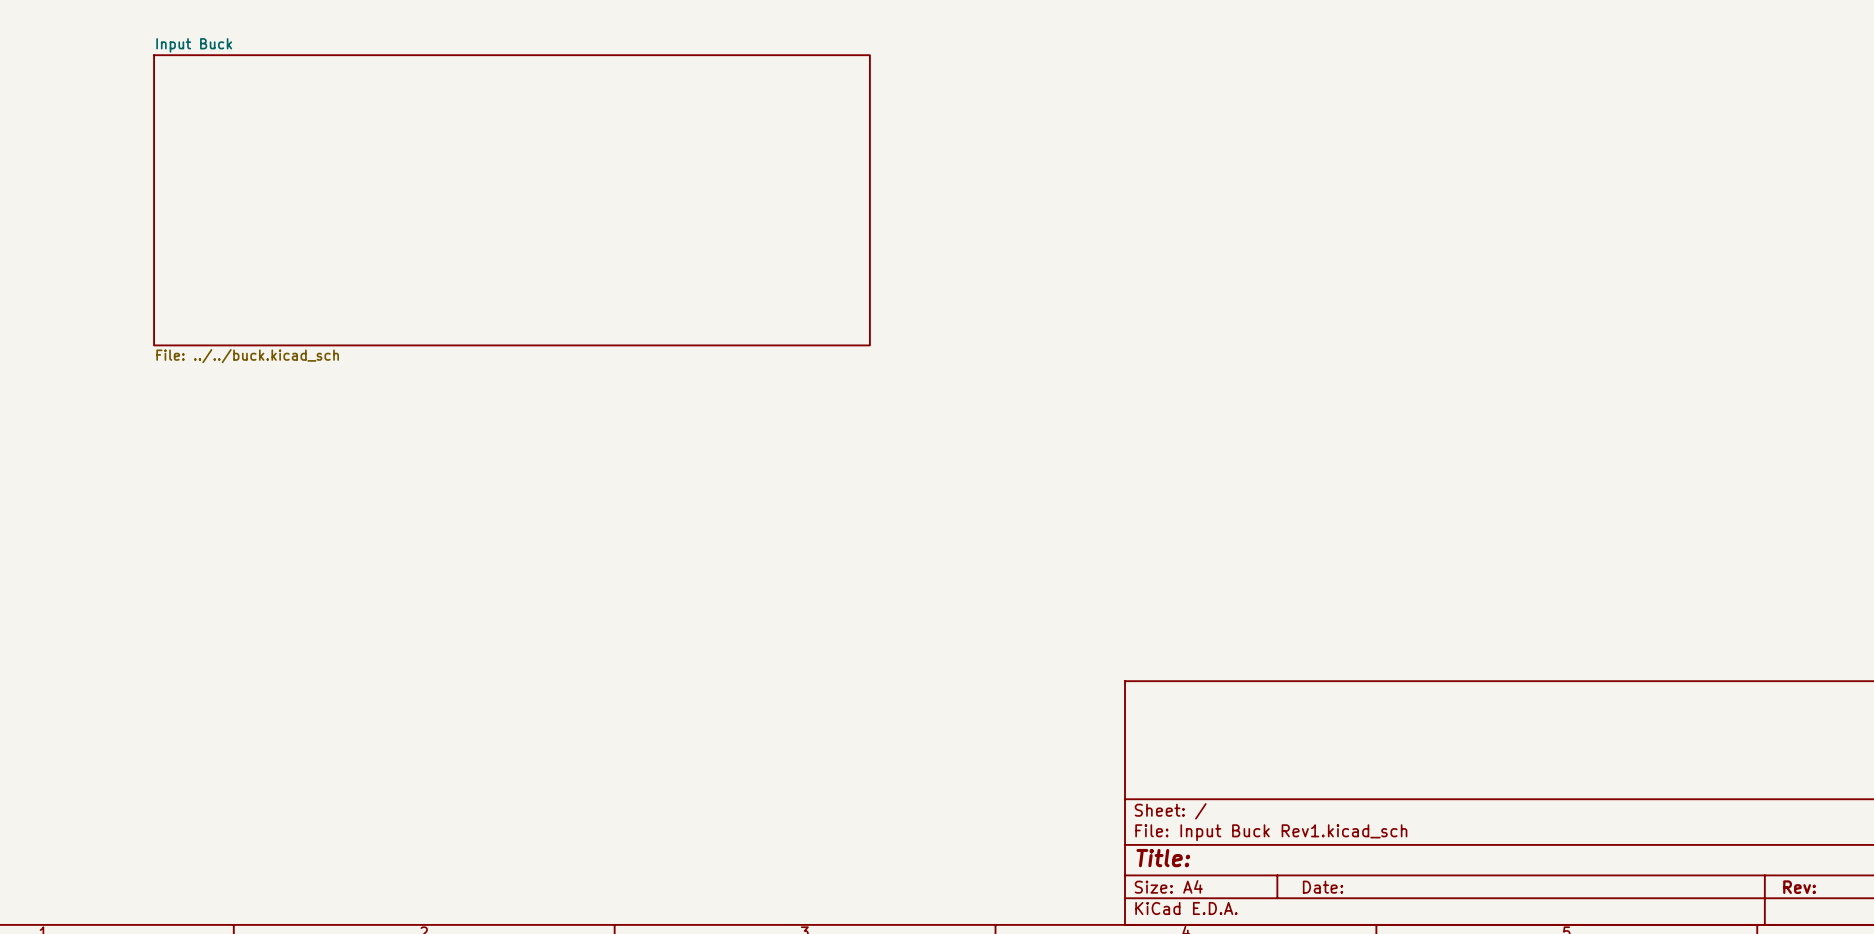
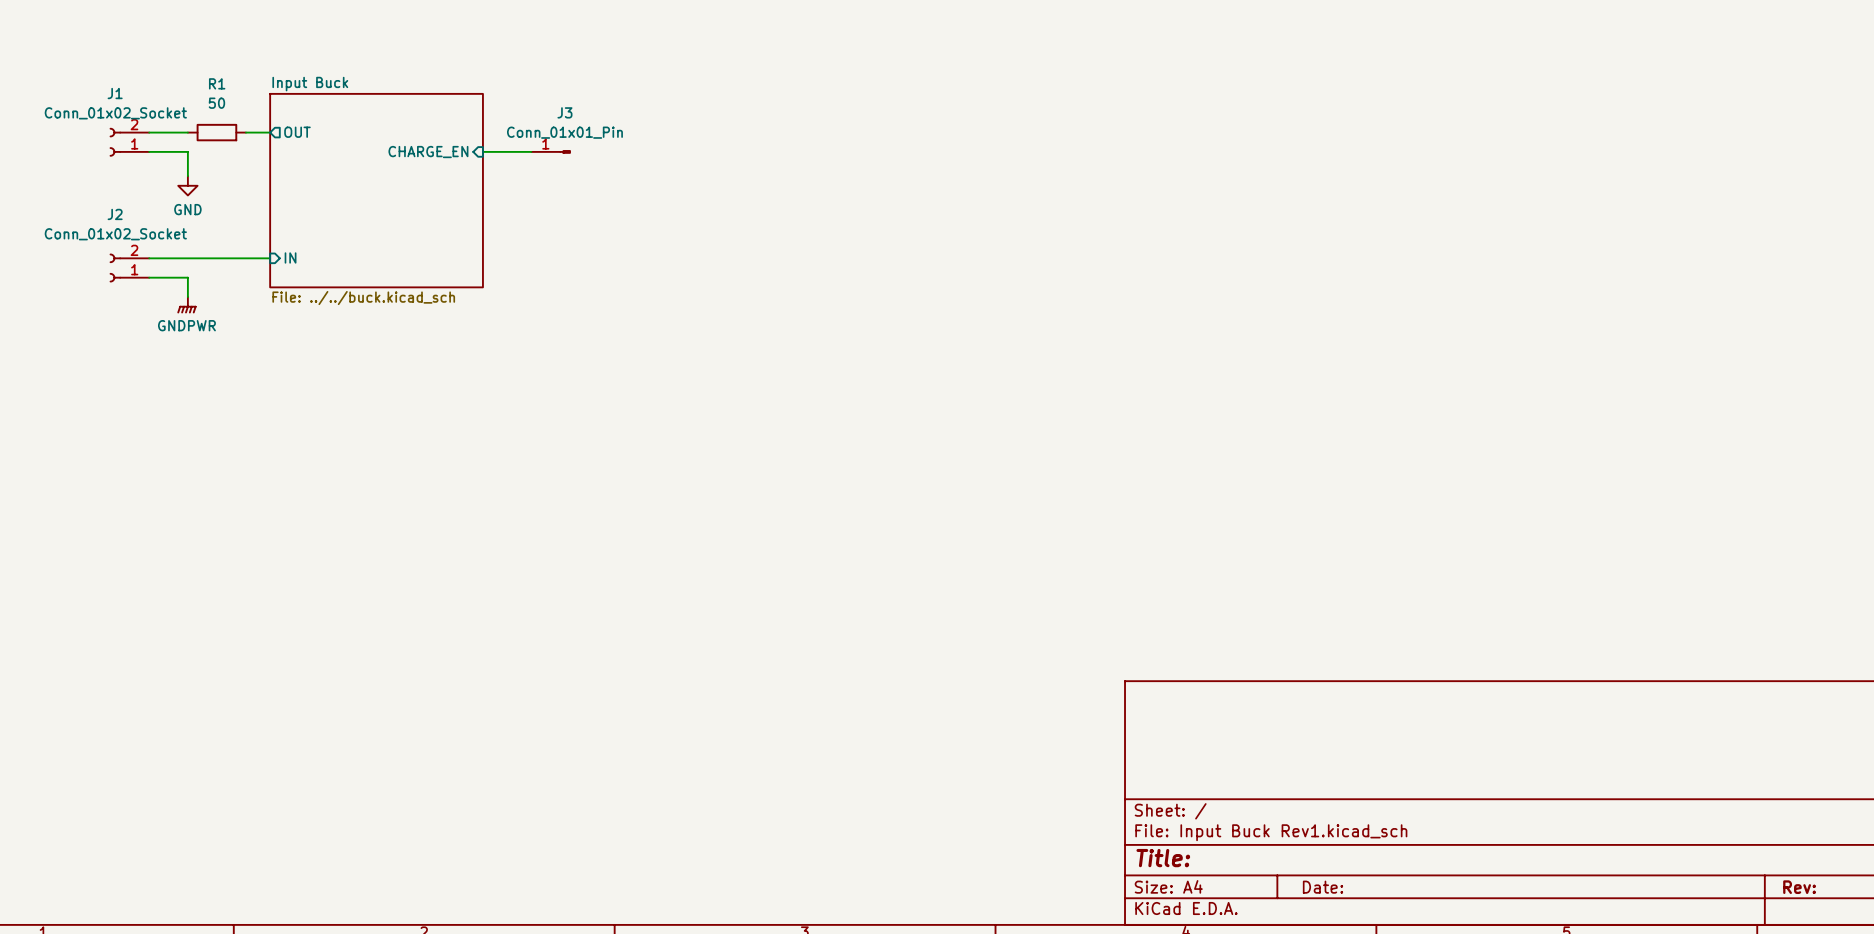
wire: none -> (149, 132) (187, 132)
R1: none -> 50 (216, 132)
wire: none -> (245, 132) (270, 132)
sheet pin: none -> OUT (297, 132)
J1: none -> Conn_01x02_Socket (129, 142)
wire: none -> (149, 151) (187, 151) (187, 176)
wire: none -> (482, 151) (531, 151)
J3: none -> Conn_01x01_Pin (550, 151)
sheet pin: none -> CHARGE_EN (428, 152)
power symbol: none -> GND (187, 185)
sheet Input Buck: none -> File: ../../buck.kicad_sch (376, 190)
sheet Input Buck: File: ../../buck.kicad_sch (511, 200) -> none
sheet pin: none -> IN (290, 257)
wire: none -> (149, 258) (270, 258)
J2: none -> Conn_01x02_Socket (129, 268)
wire: none -> (149, 277) (187, 277) (187, 297)
power symbol: none -> GNDPWR (186, 305)

